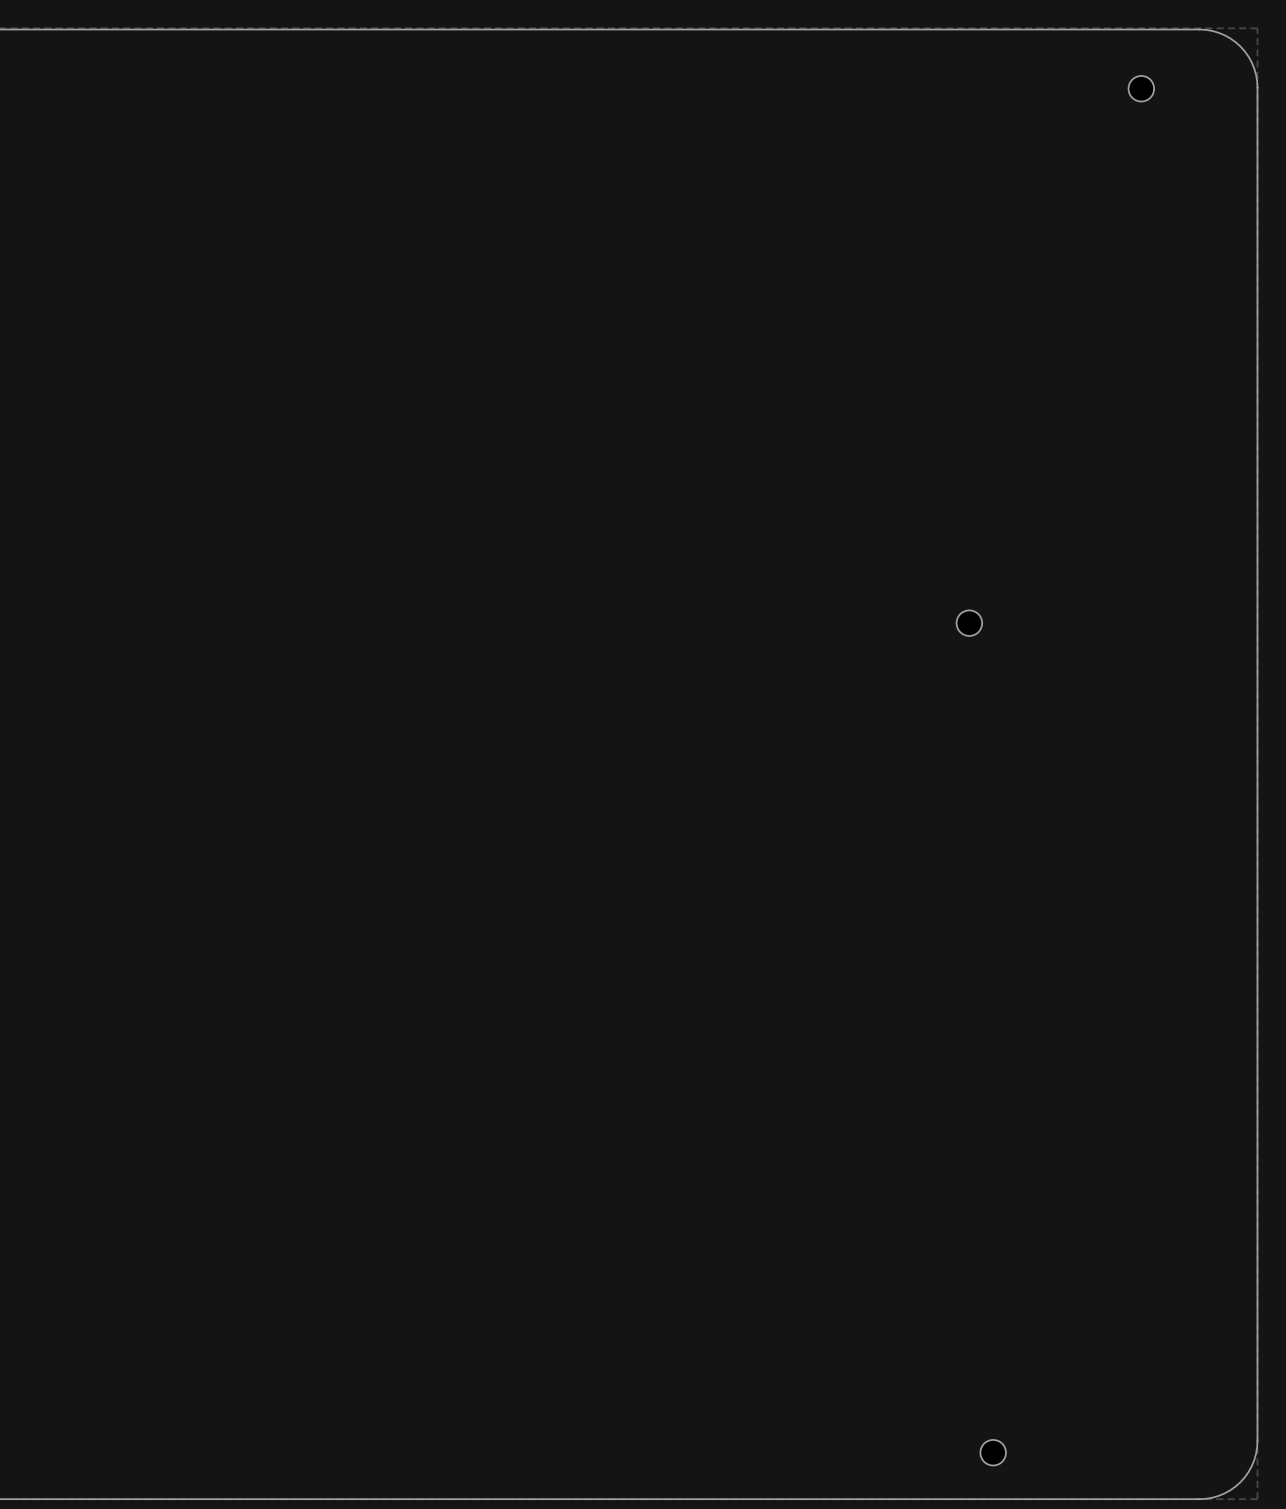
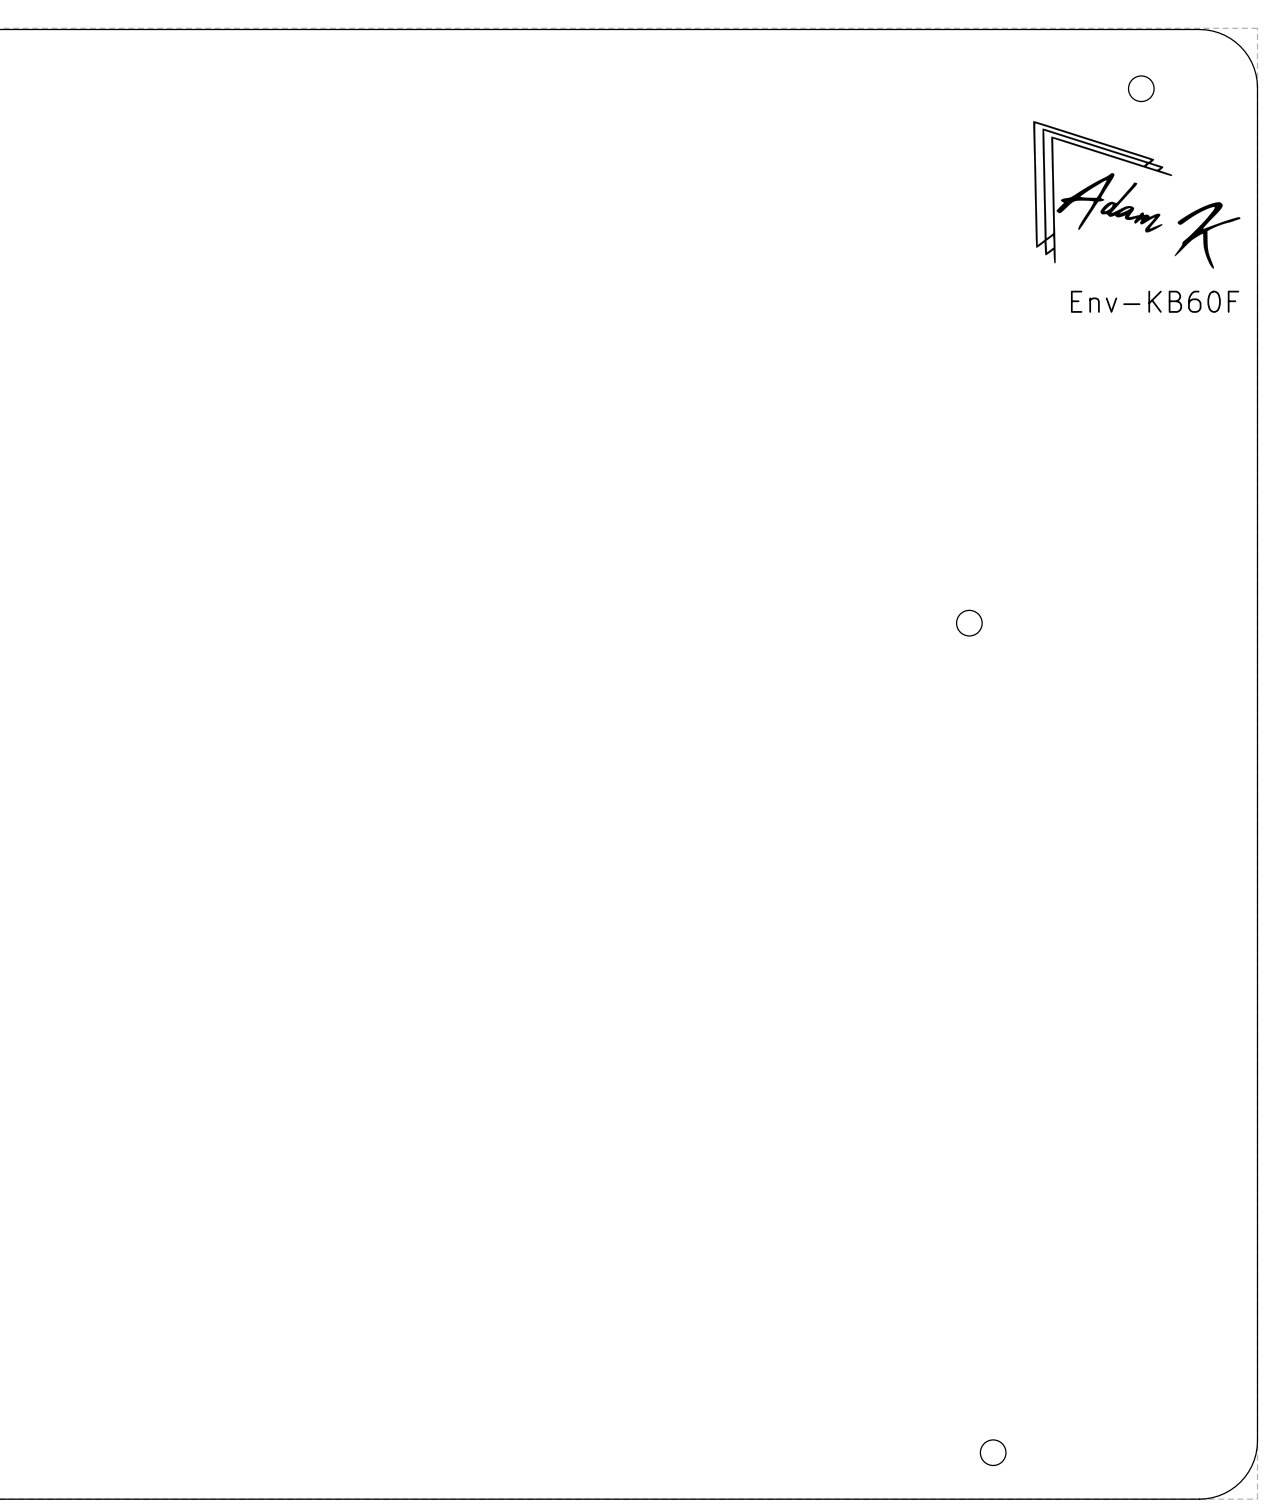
drawing: none -> [1033, 121, 1241, 269]
text: none -> Env-KB60F (1155, 301)

